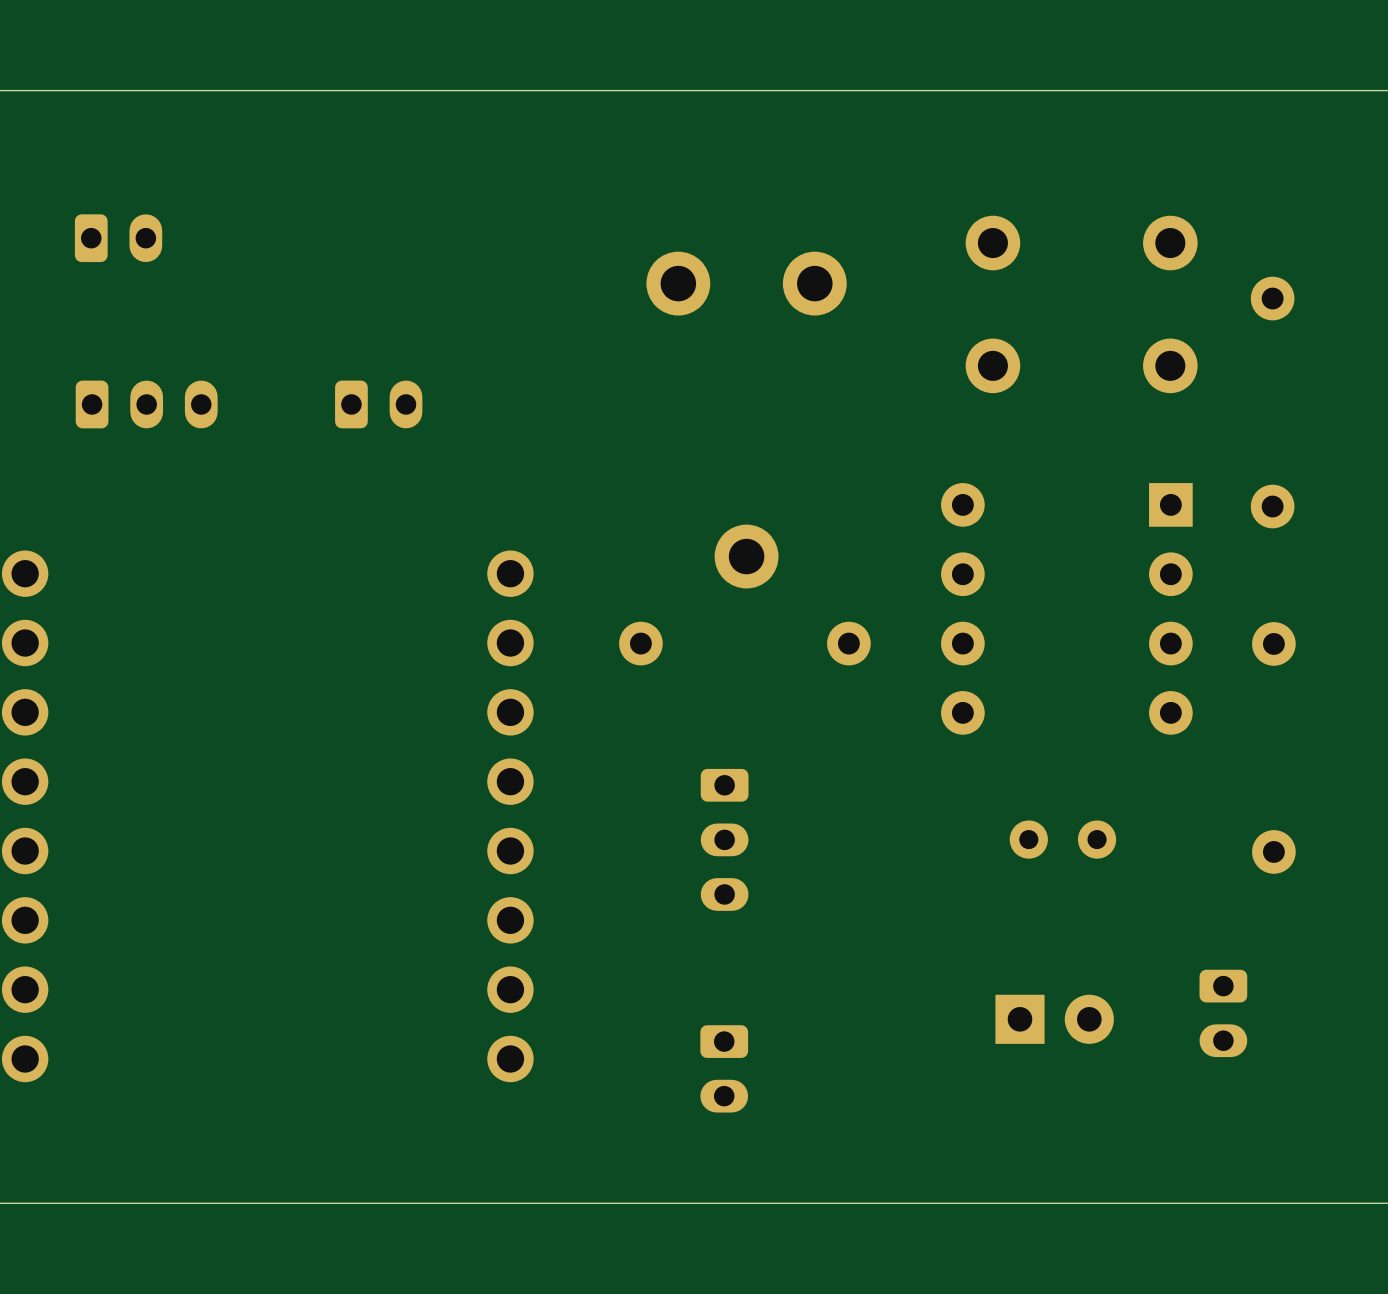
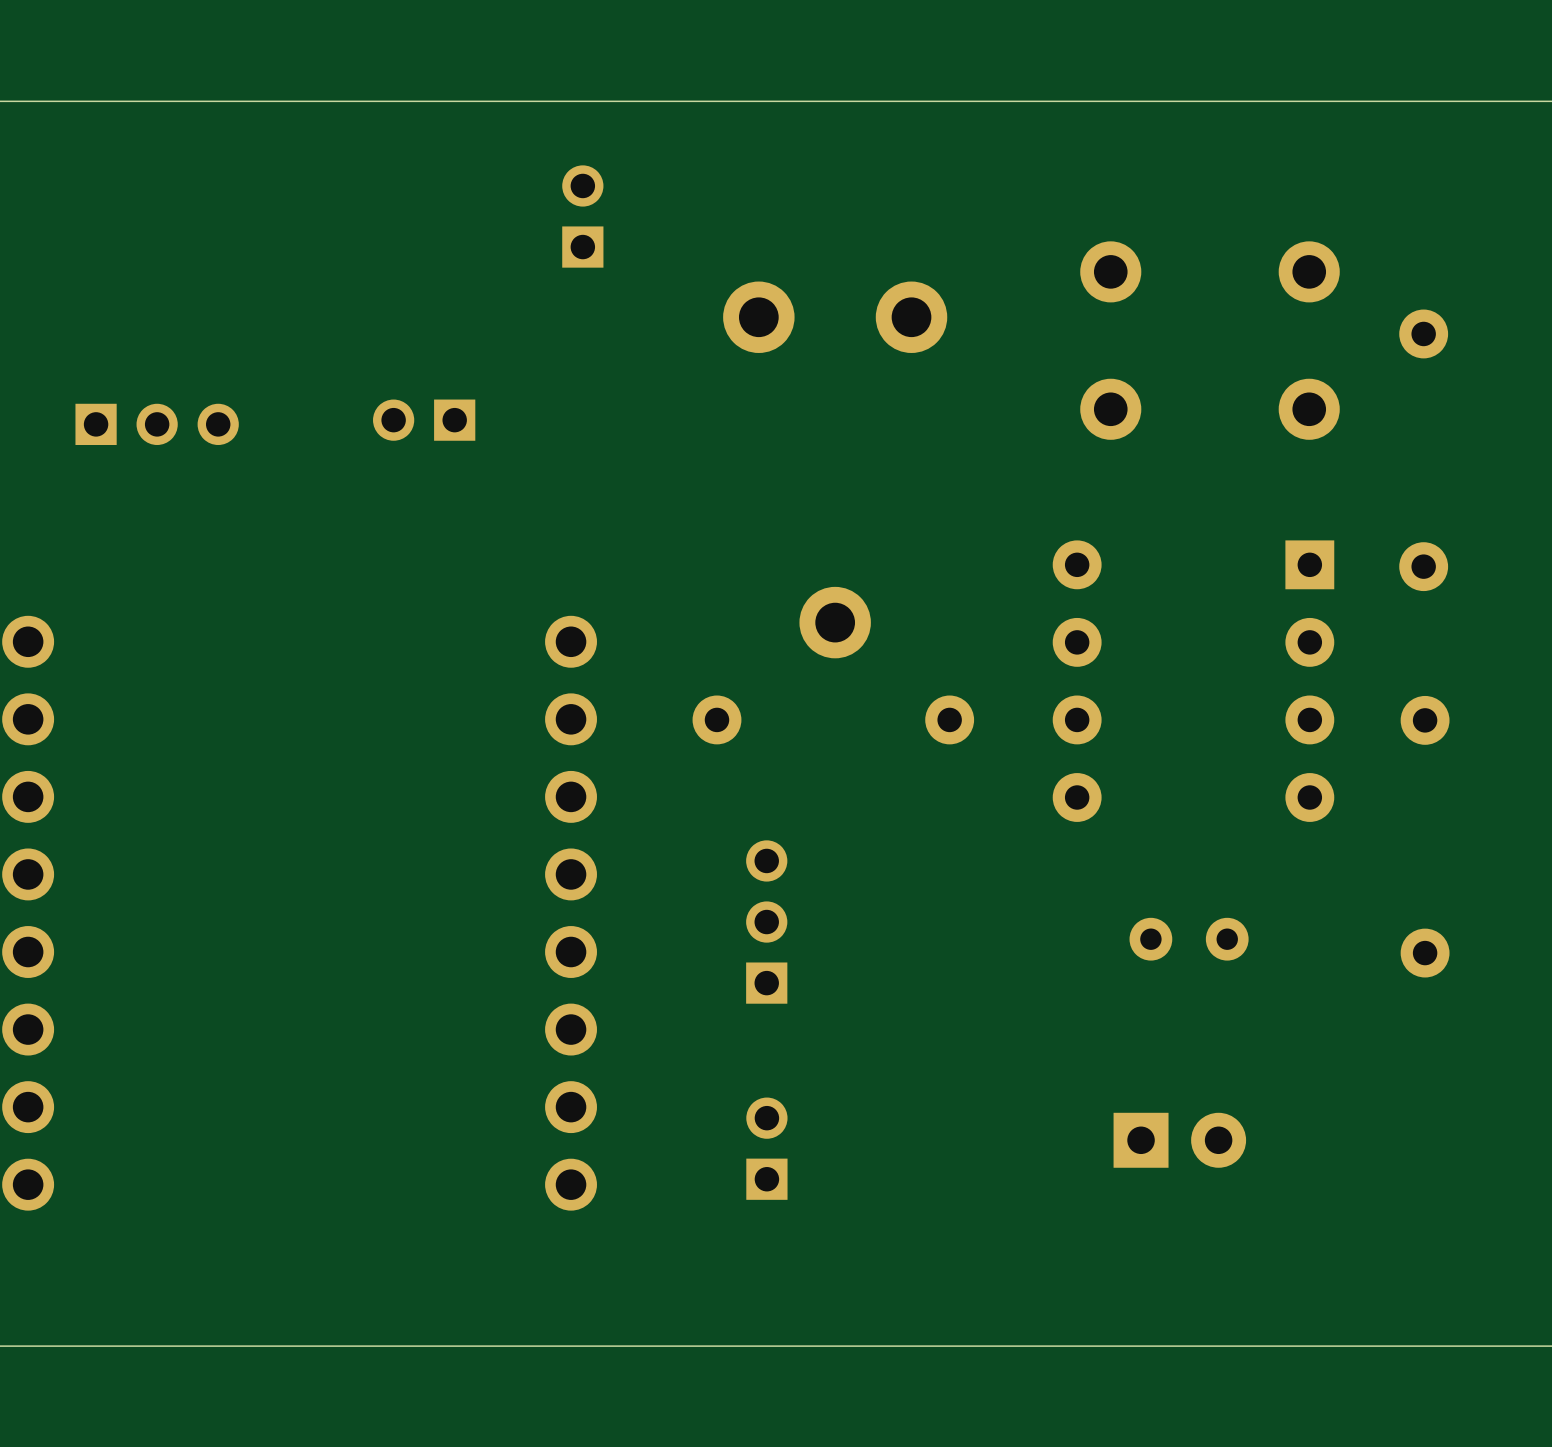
part: none -> (582, 216)
part: (118, 238) -> none
part: none -> (424, 420)
part footprint: [75, 380, 218, 429] -> [75, 403, 239, 446]
part: (378, 404) -> none
part: none -> (766, 922)
part: (724, 839) -> none
part: (1223, 1013) -> none
part: none -> (766, 1148)
part: (724, 1068) -> none

